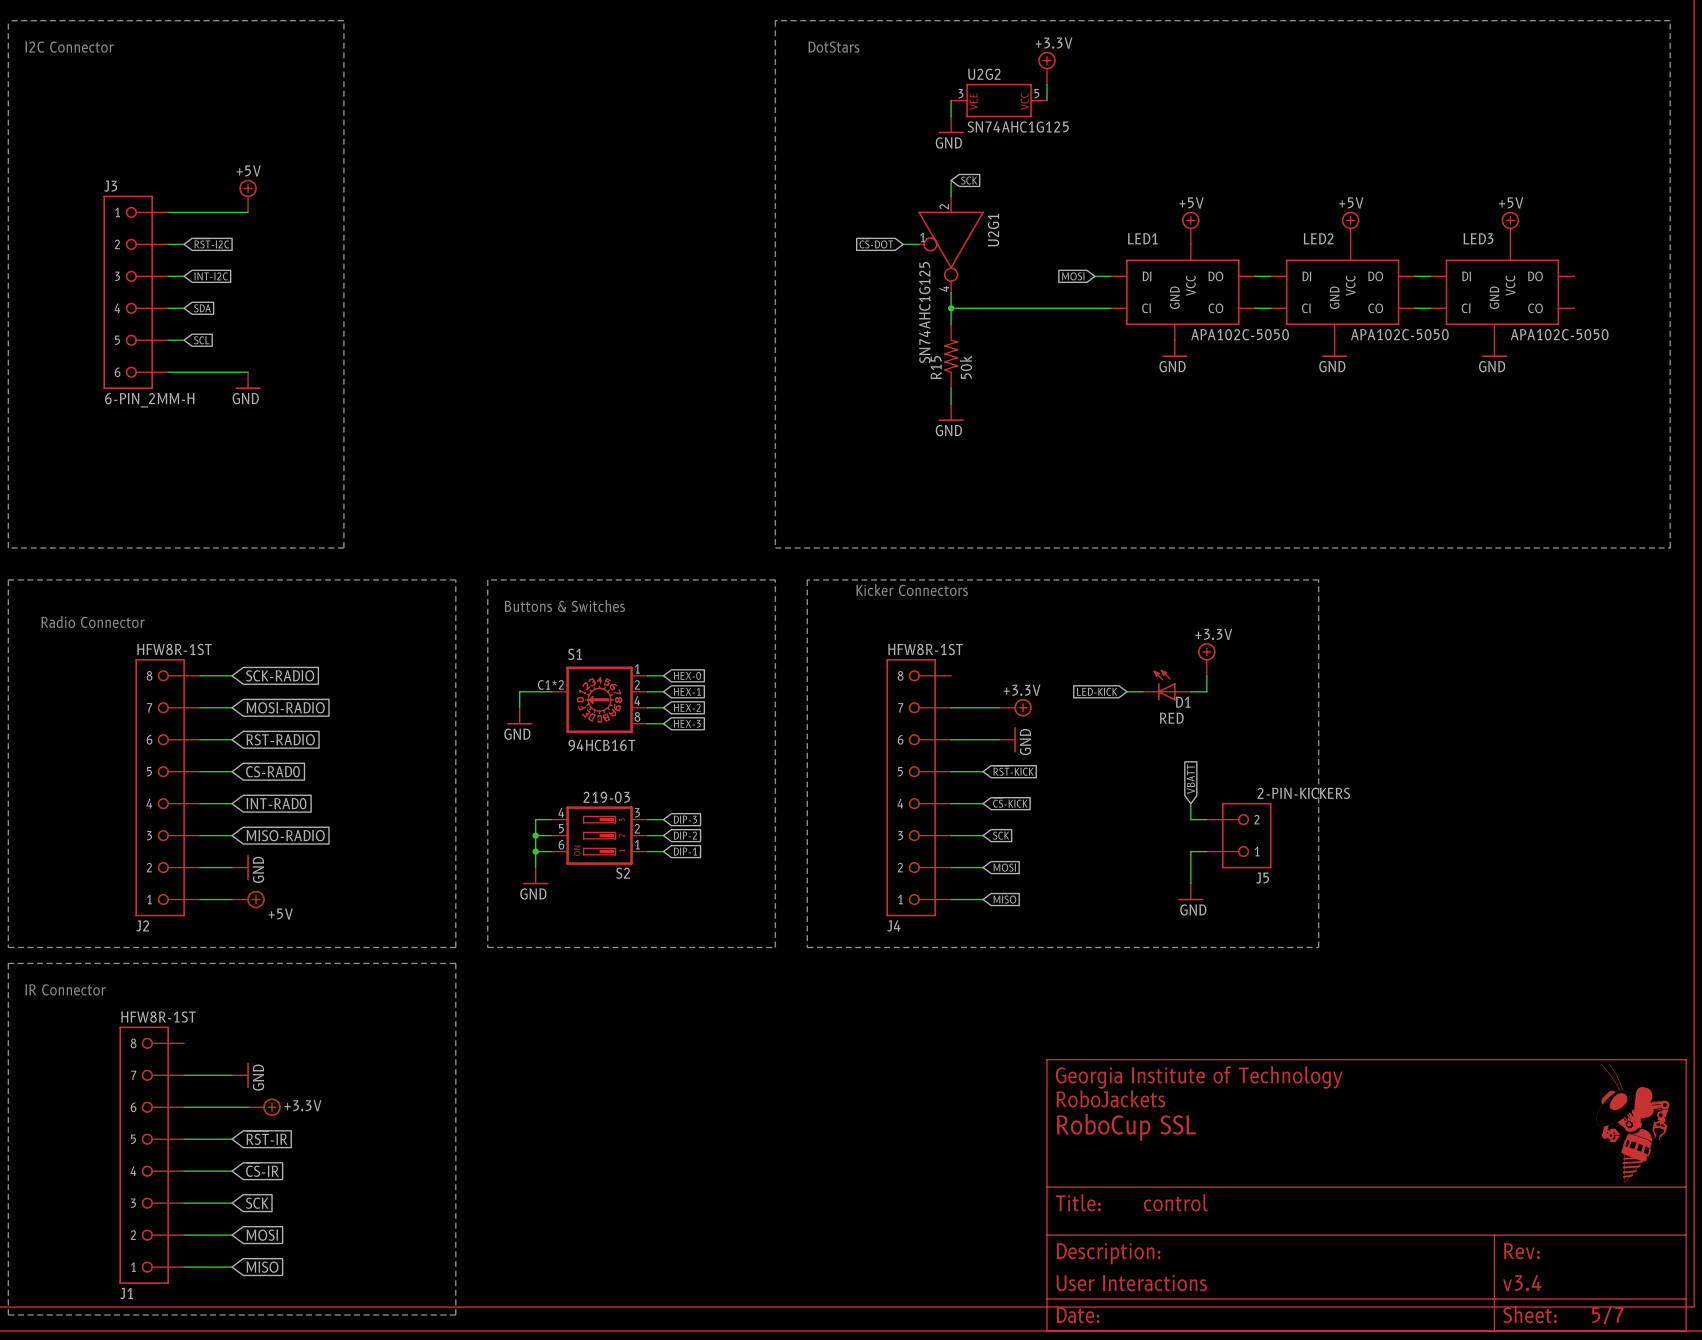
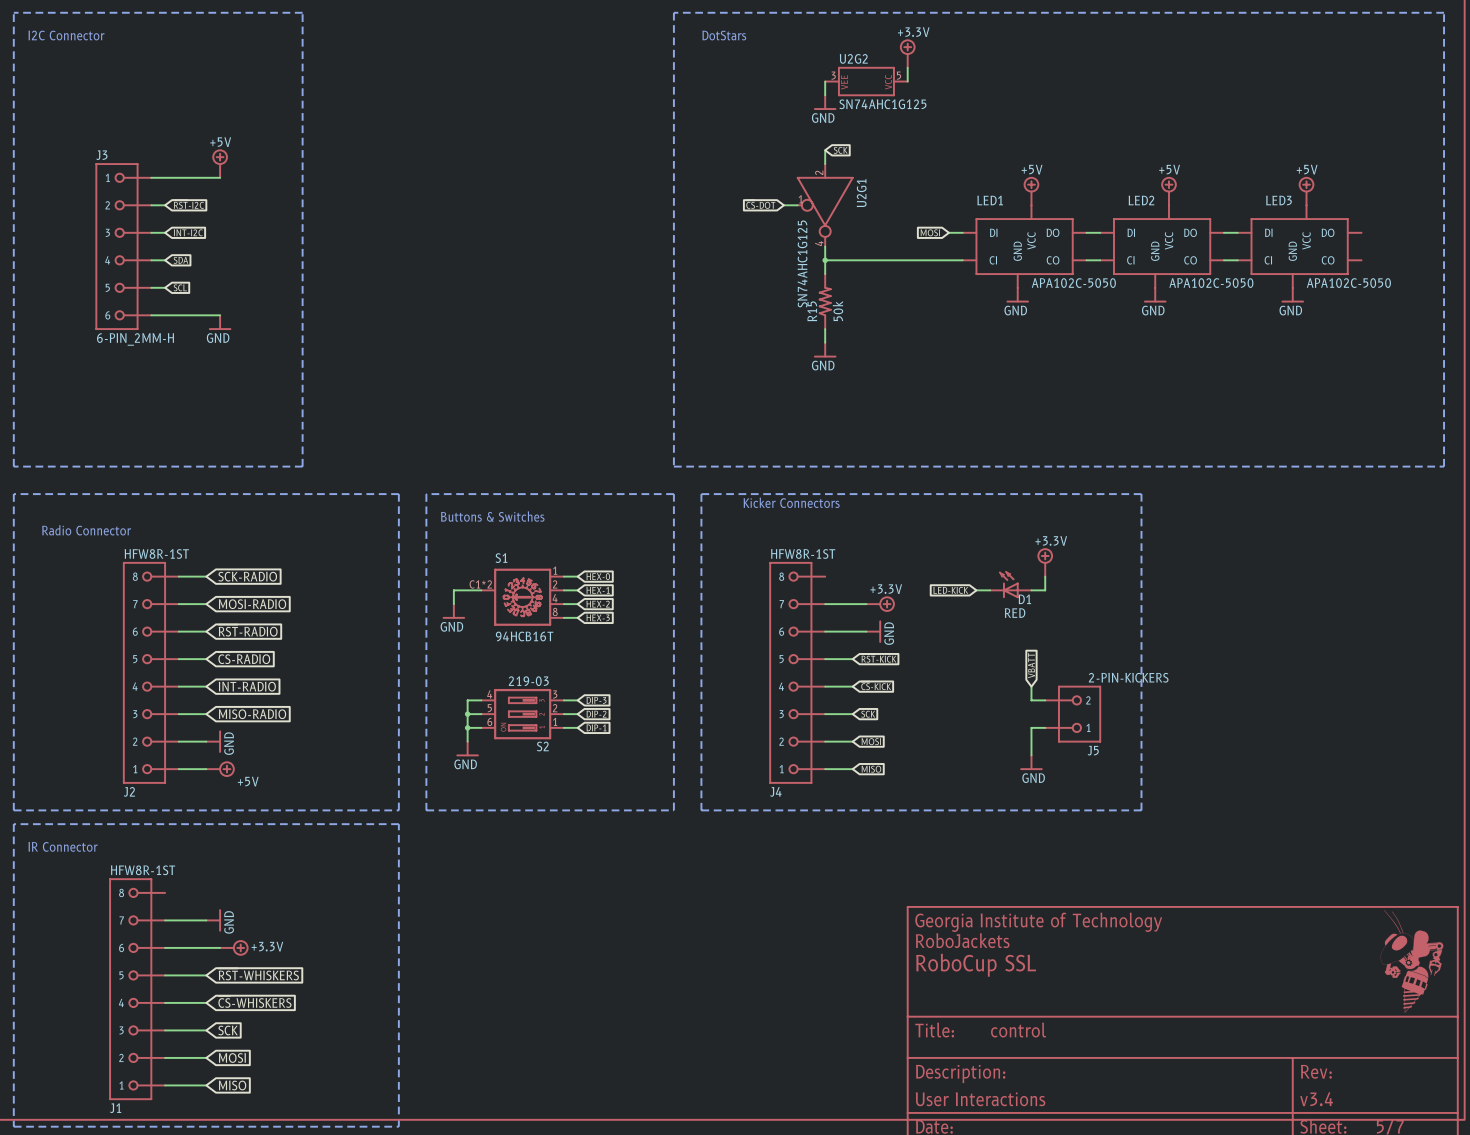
global label: ~{CS}-RAD0 (272, 770) -> ~{CS}-RADIO (244, 658)
global label: INT-RAD0 (276, 803) -> INT-RADIO (247, 686)
global label: ~{RST}-IR (266, 1138) -> ~{RST}-WHISKERS (258, 974)
global label: ~{CS}-IR (262, 1169) -> ~{CS}-WHISKERS (254, 1001)

